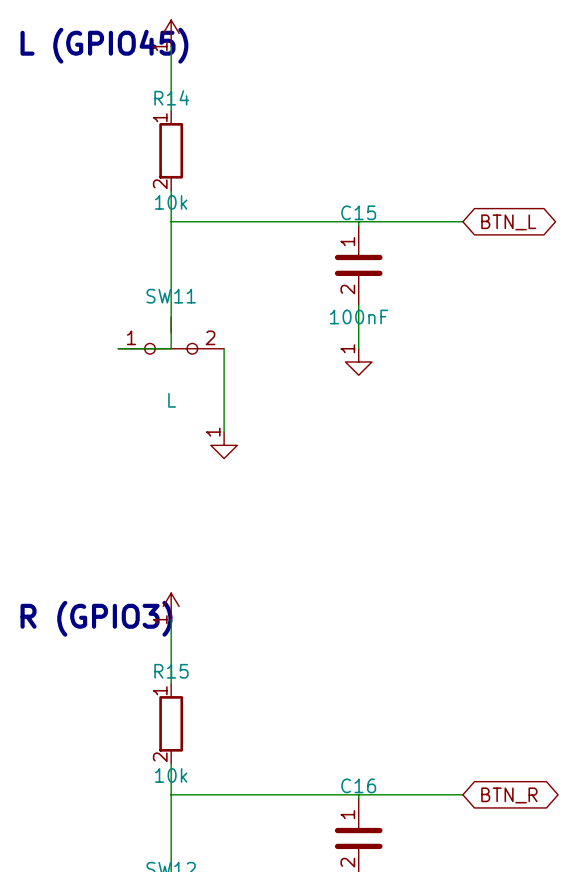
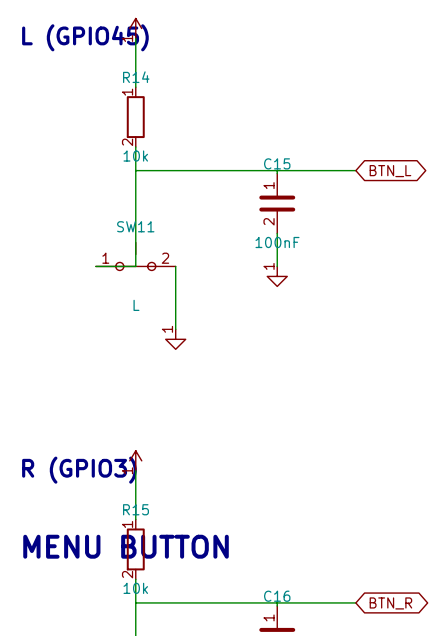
text: none -> MENU BUTTON (126, 546)

